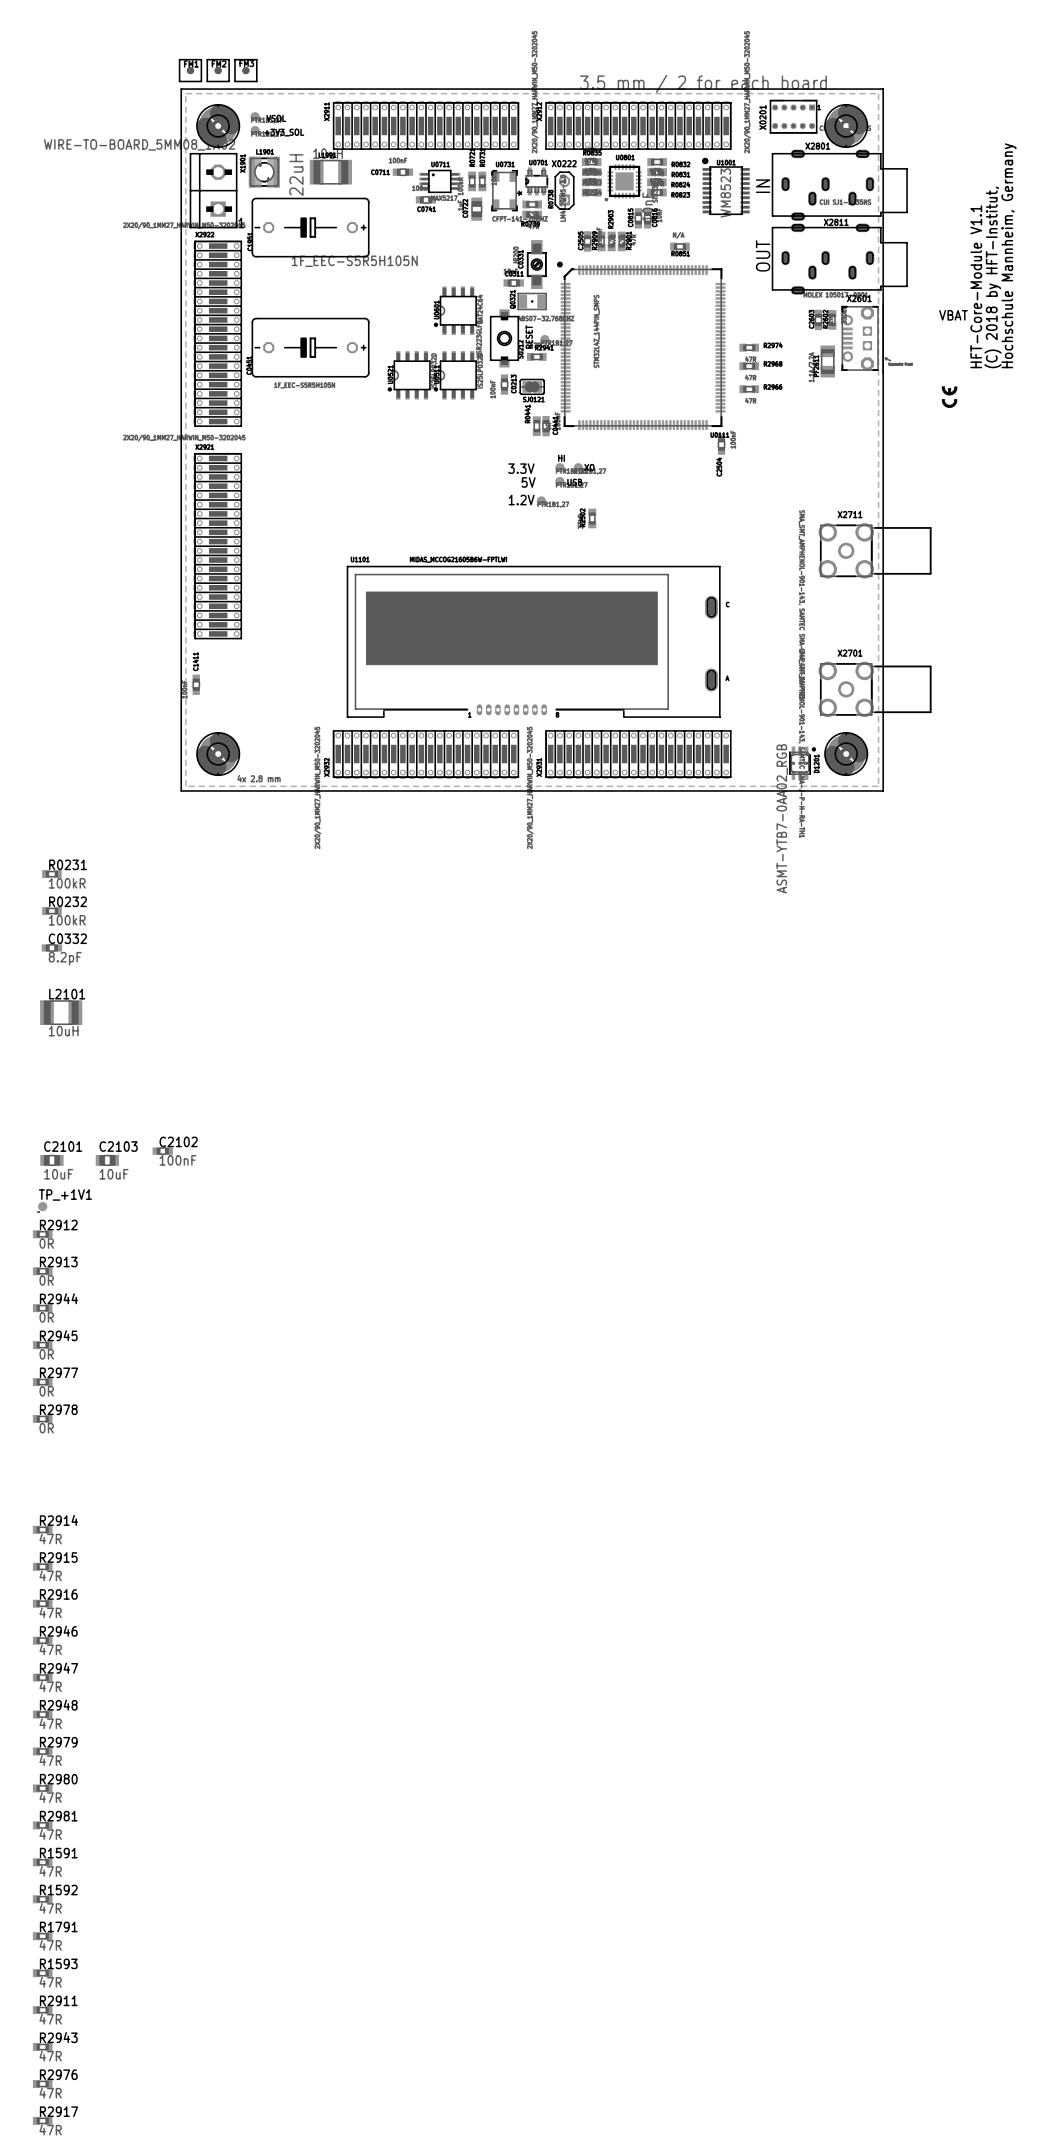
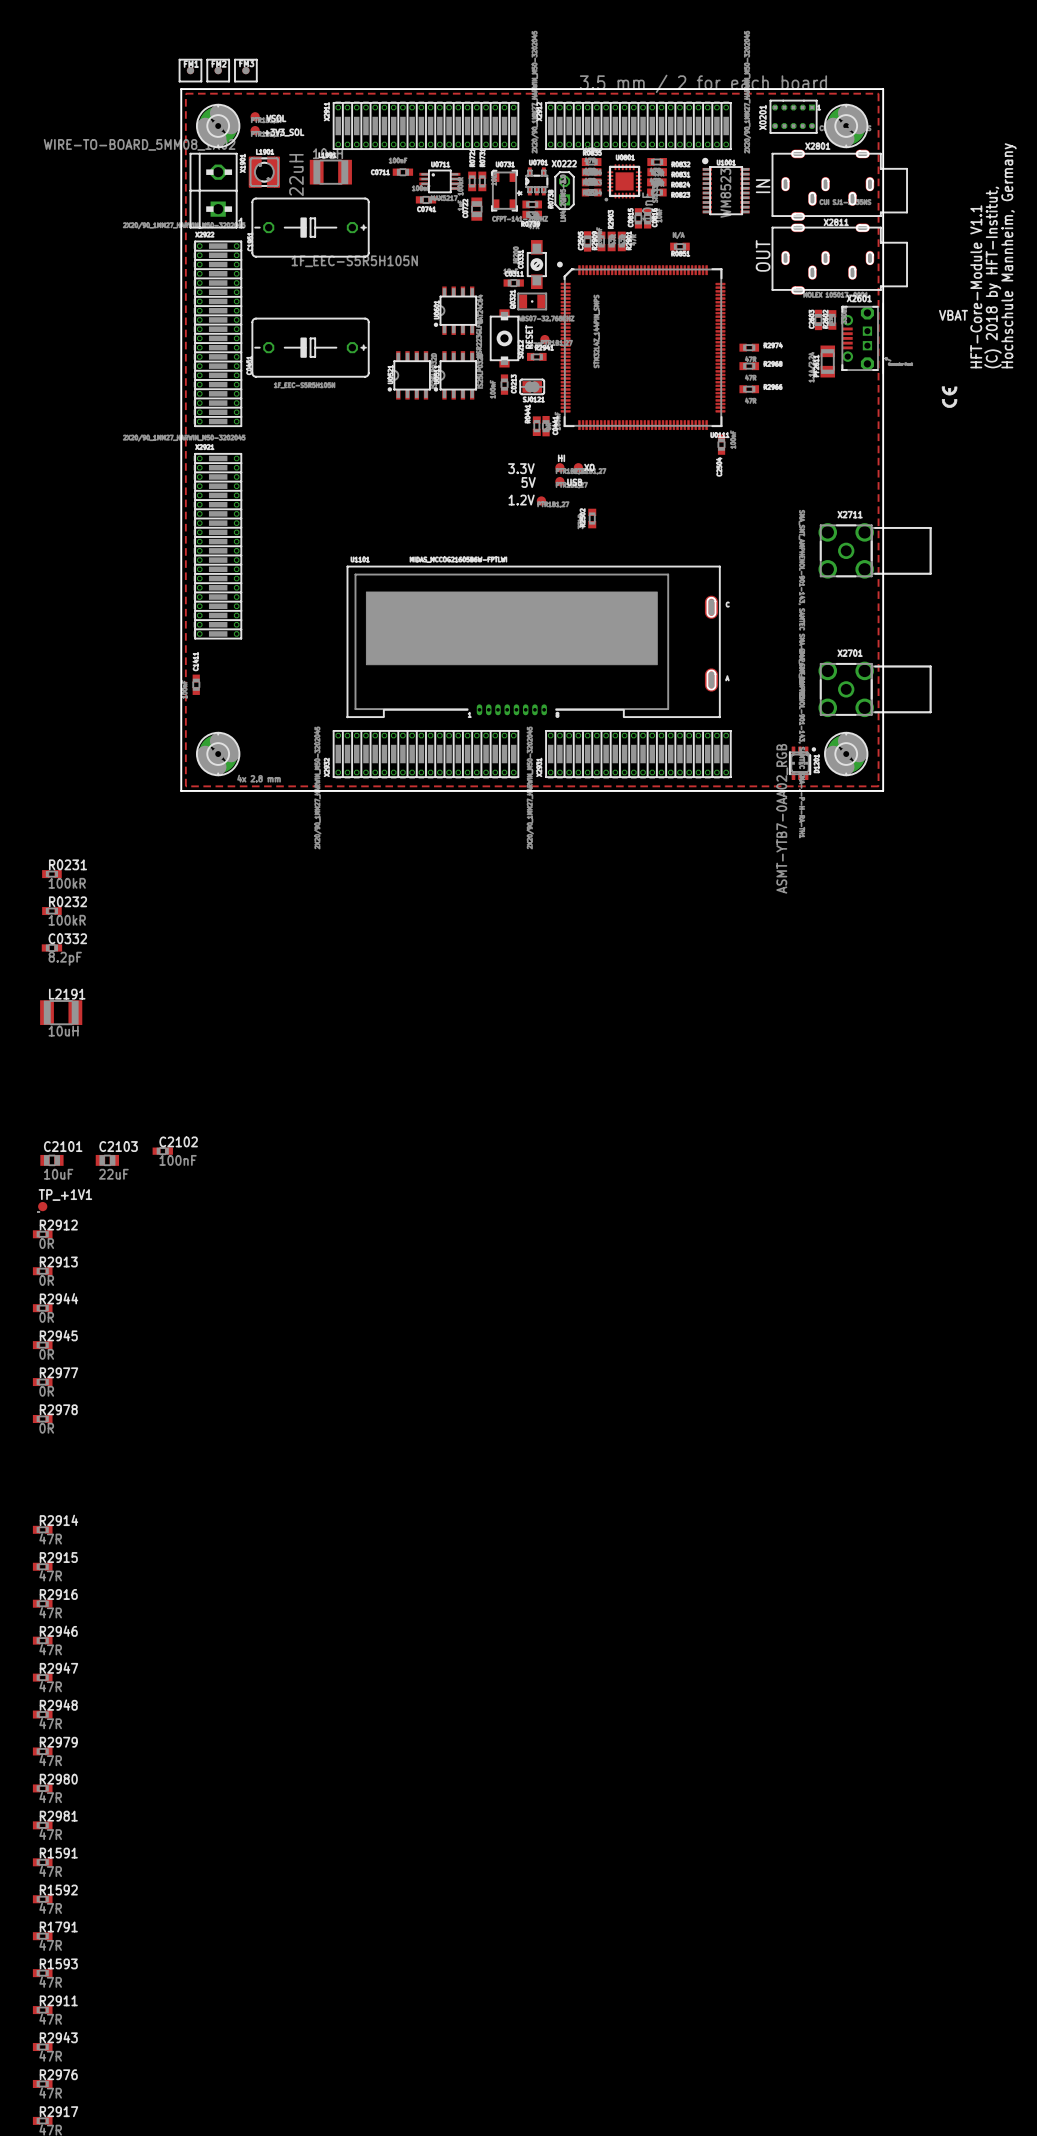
L2101 name: L2101 (67, 994) -> L2191 (67, 994)
C2103 value: 10uF (114, 1174) -> 22uF (113, 1174)

